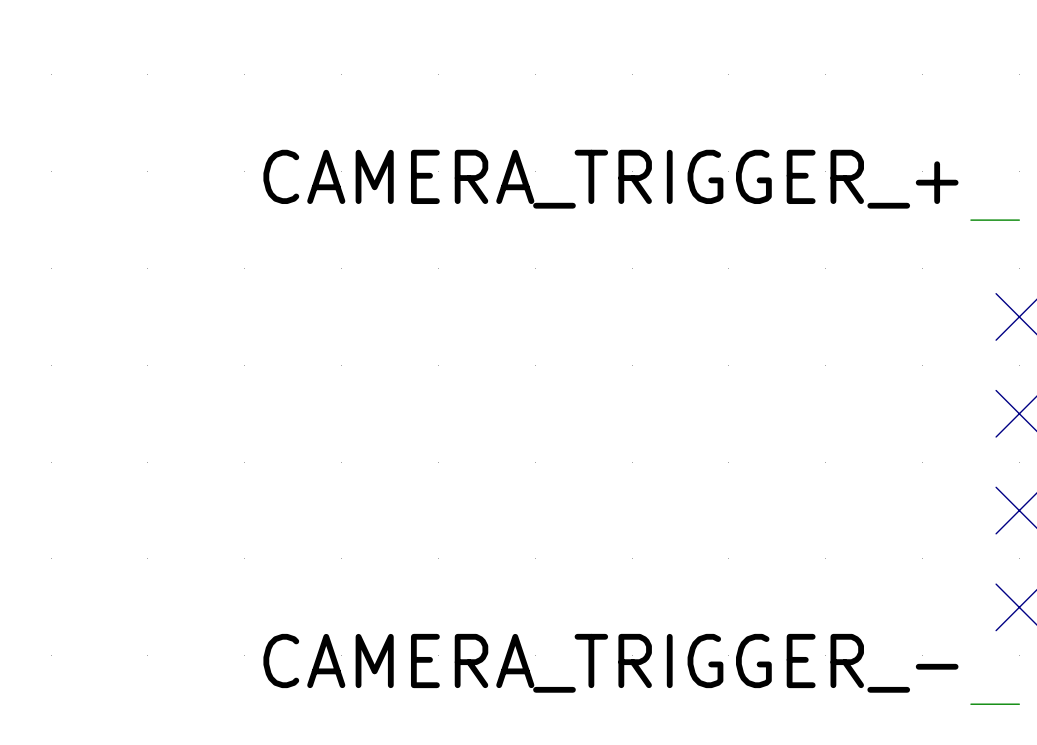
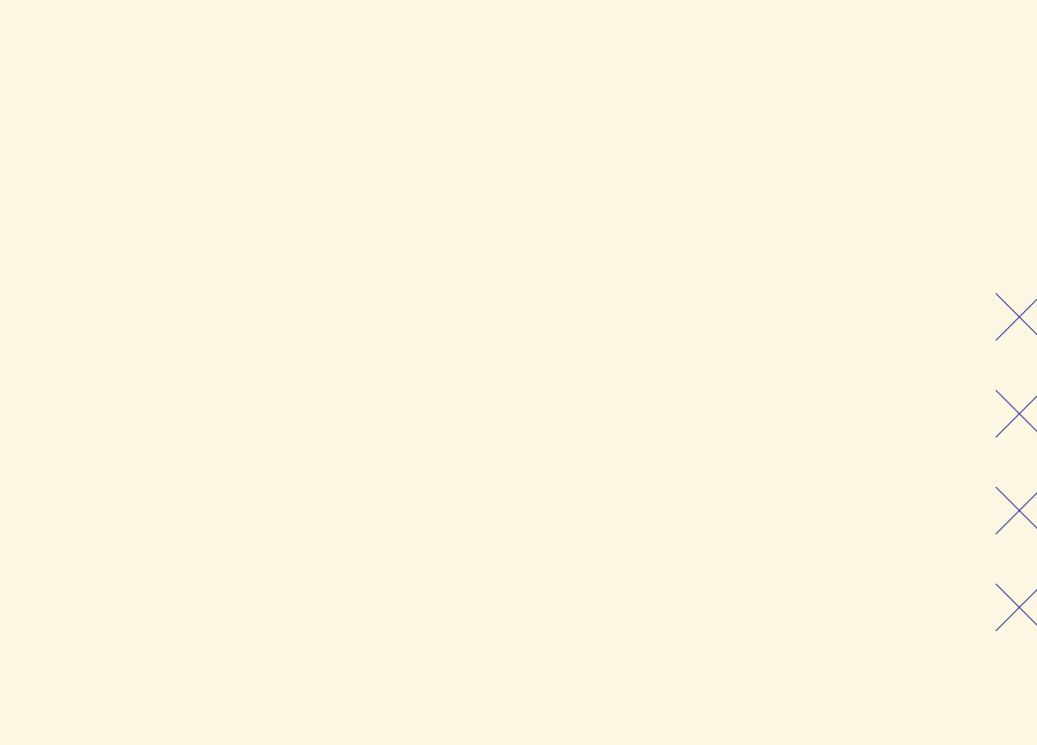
label: CAMERA_TRIGGER_+ (610, 179) -> none
wire: (970, 220) (1019, 220) -> none
label: CAMERA_TRIGGER_- (610, 663) -> none
wire: (970, 704) (1019, 704) -> none

